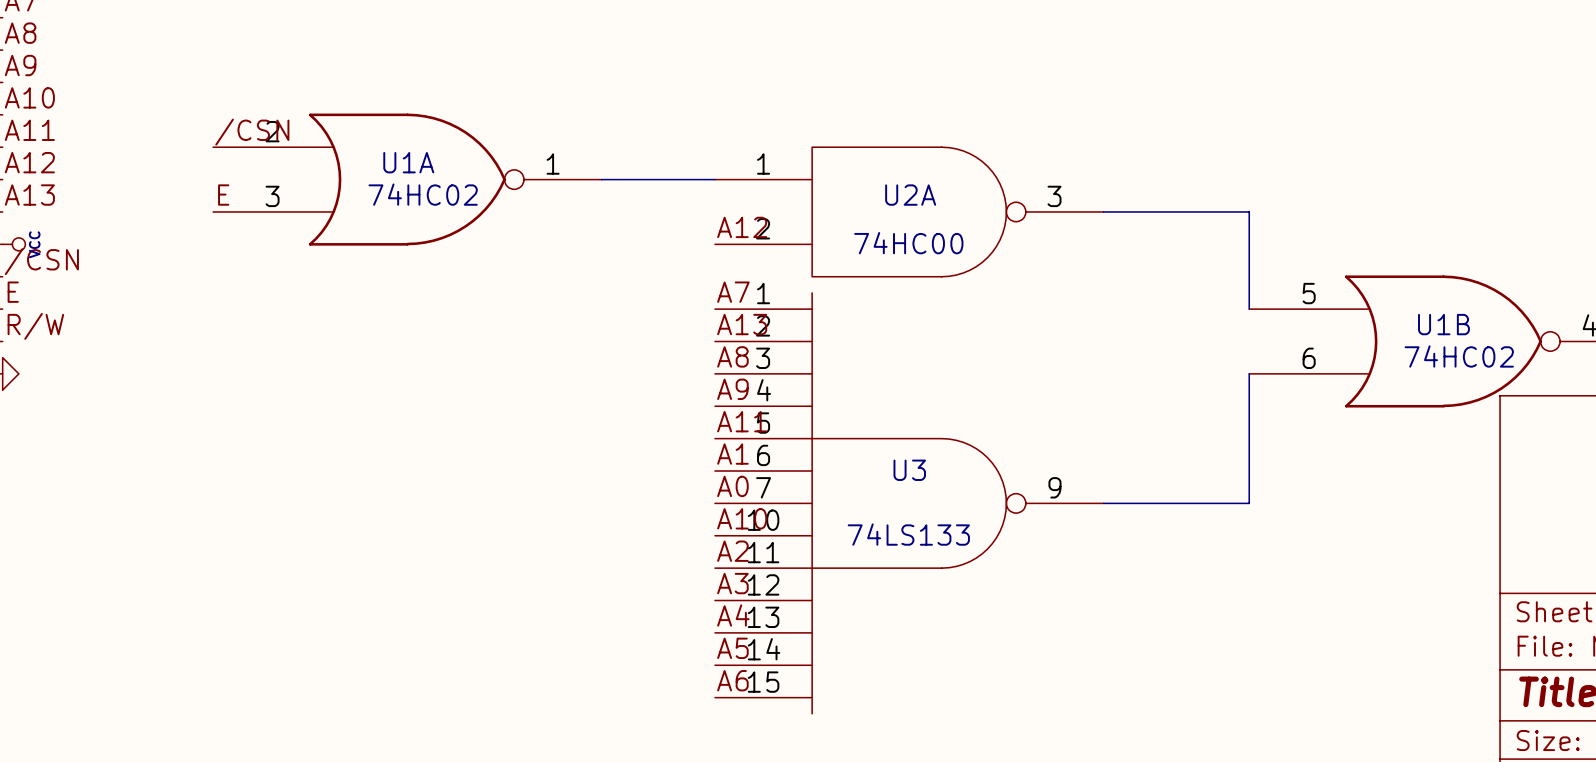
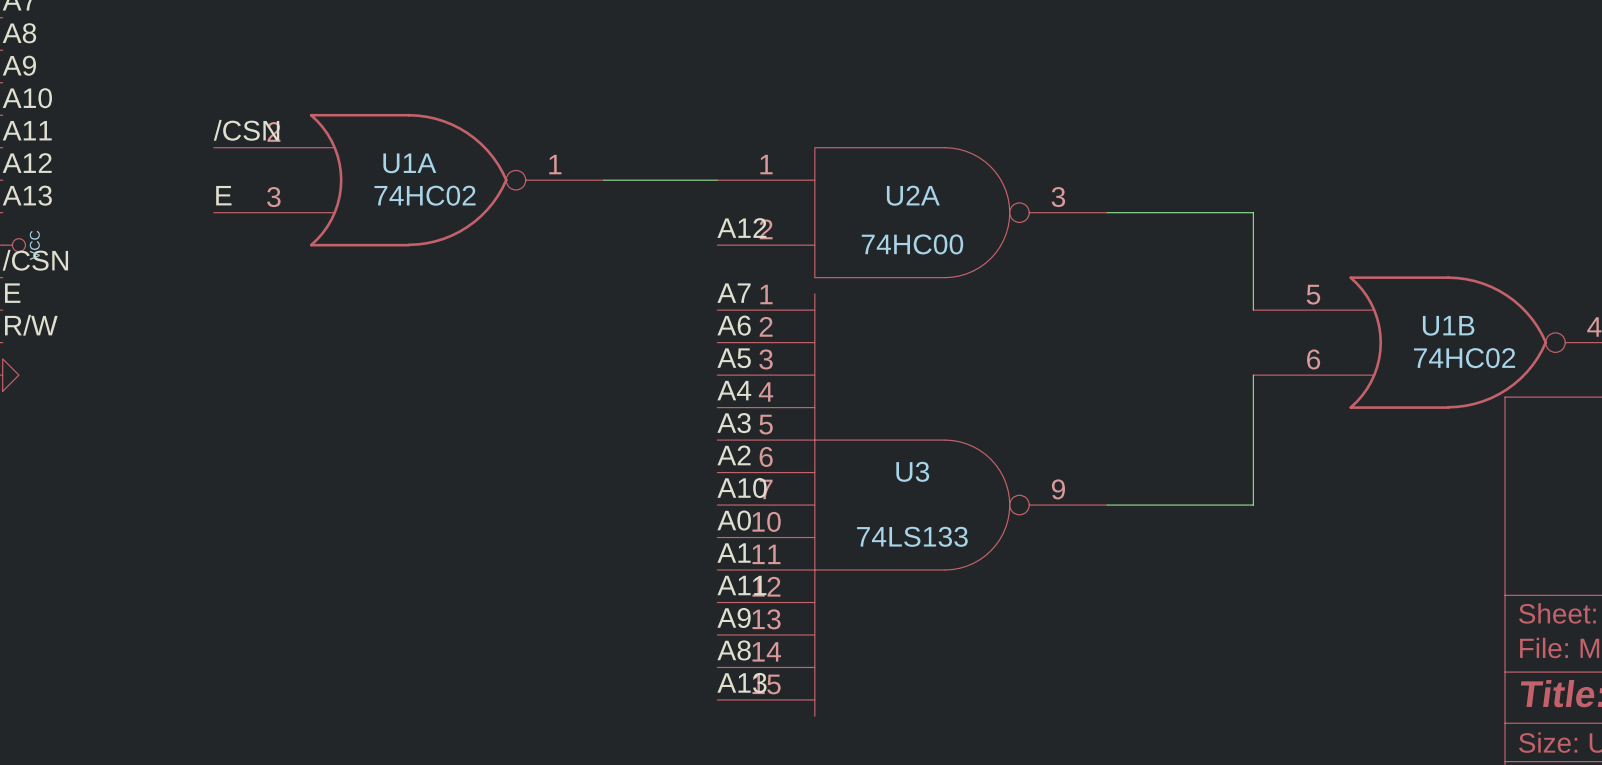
label: A13 (742, 324) -> A6 (734, 325)
label: A8 (732, 356) -> A5 (734, 358)
label: A9 (732, 389) -> A4 (734, 390)
label: A11 (742, 421) -> A3 (734, 423)
label: A1 (732, 454) -> A2 (734, 455)
label: A0 (732, 486) -> A10 (742, 488)
label: A10 (742, 518) -> A0 (734, 520)
label: A2 (732, 551) -> A1 (734, 553)
label: A3 (732, 583) -> A11 (741, 585)
label: A4 (733, 615) -> A9 (734, 617)
label: A5 (732, 648) -> A8 (734, 650)
label: A6 (732, 680) -> A13 (741, 682)

